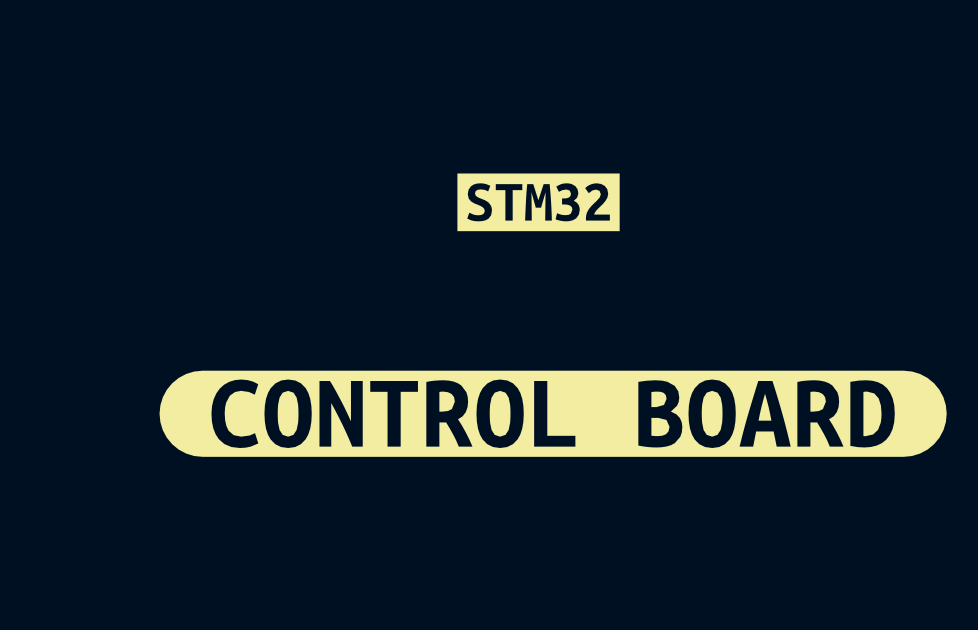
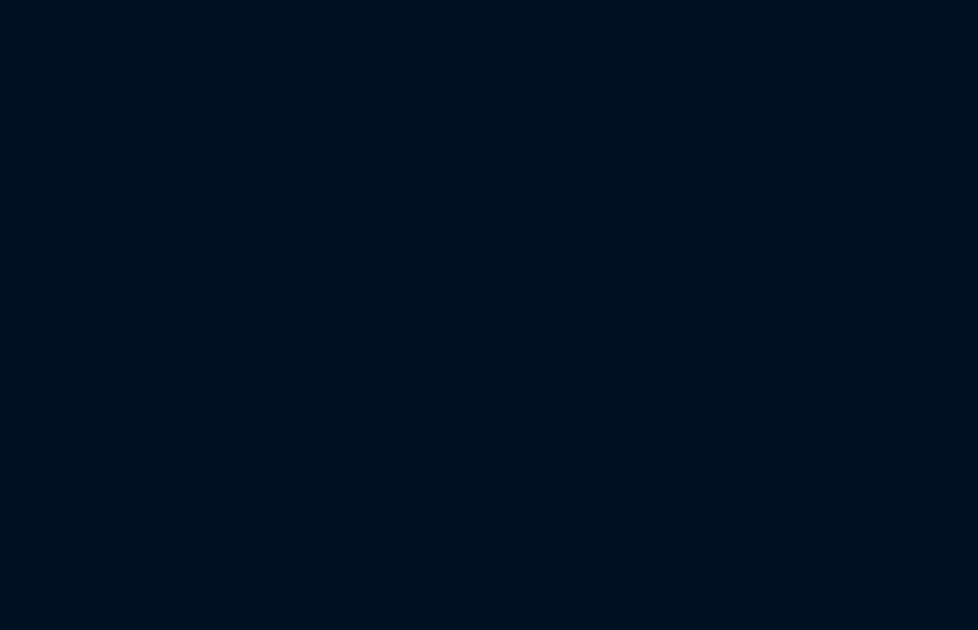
drawing: [457, 173, 620, 232] -> none
drawing: [159, 370, 947, 457] -> none

